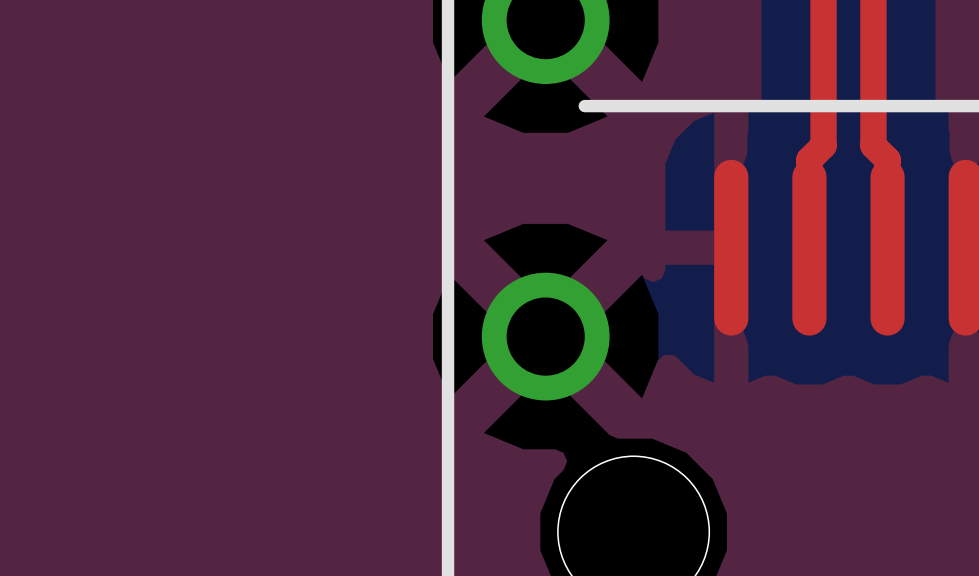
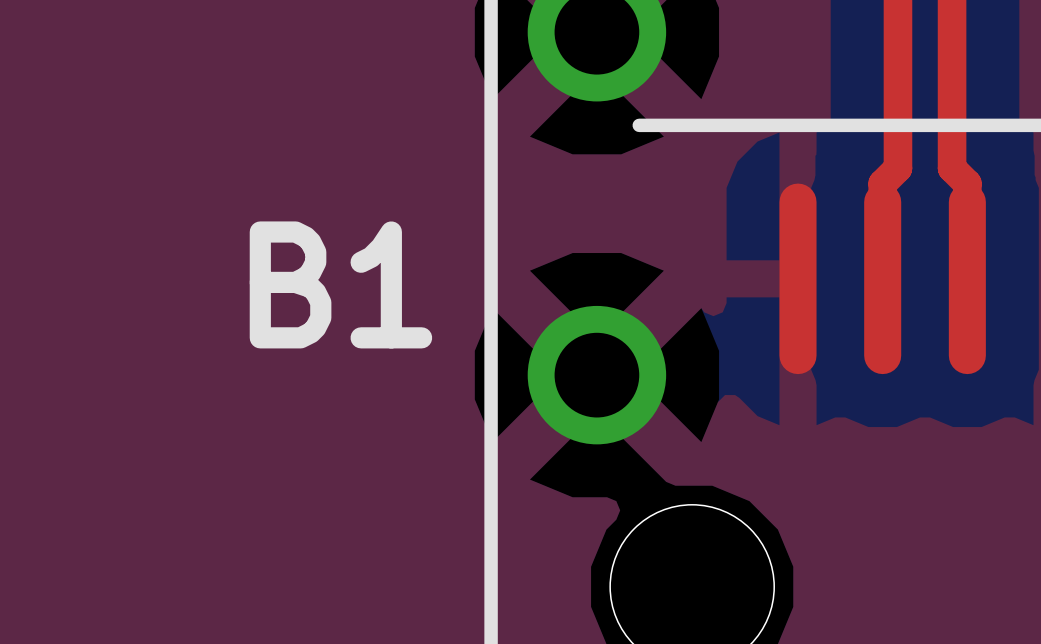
text: none -> B1 (340, 284)

